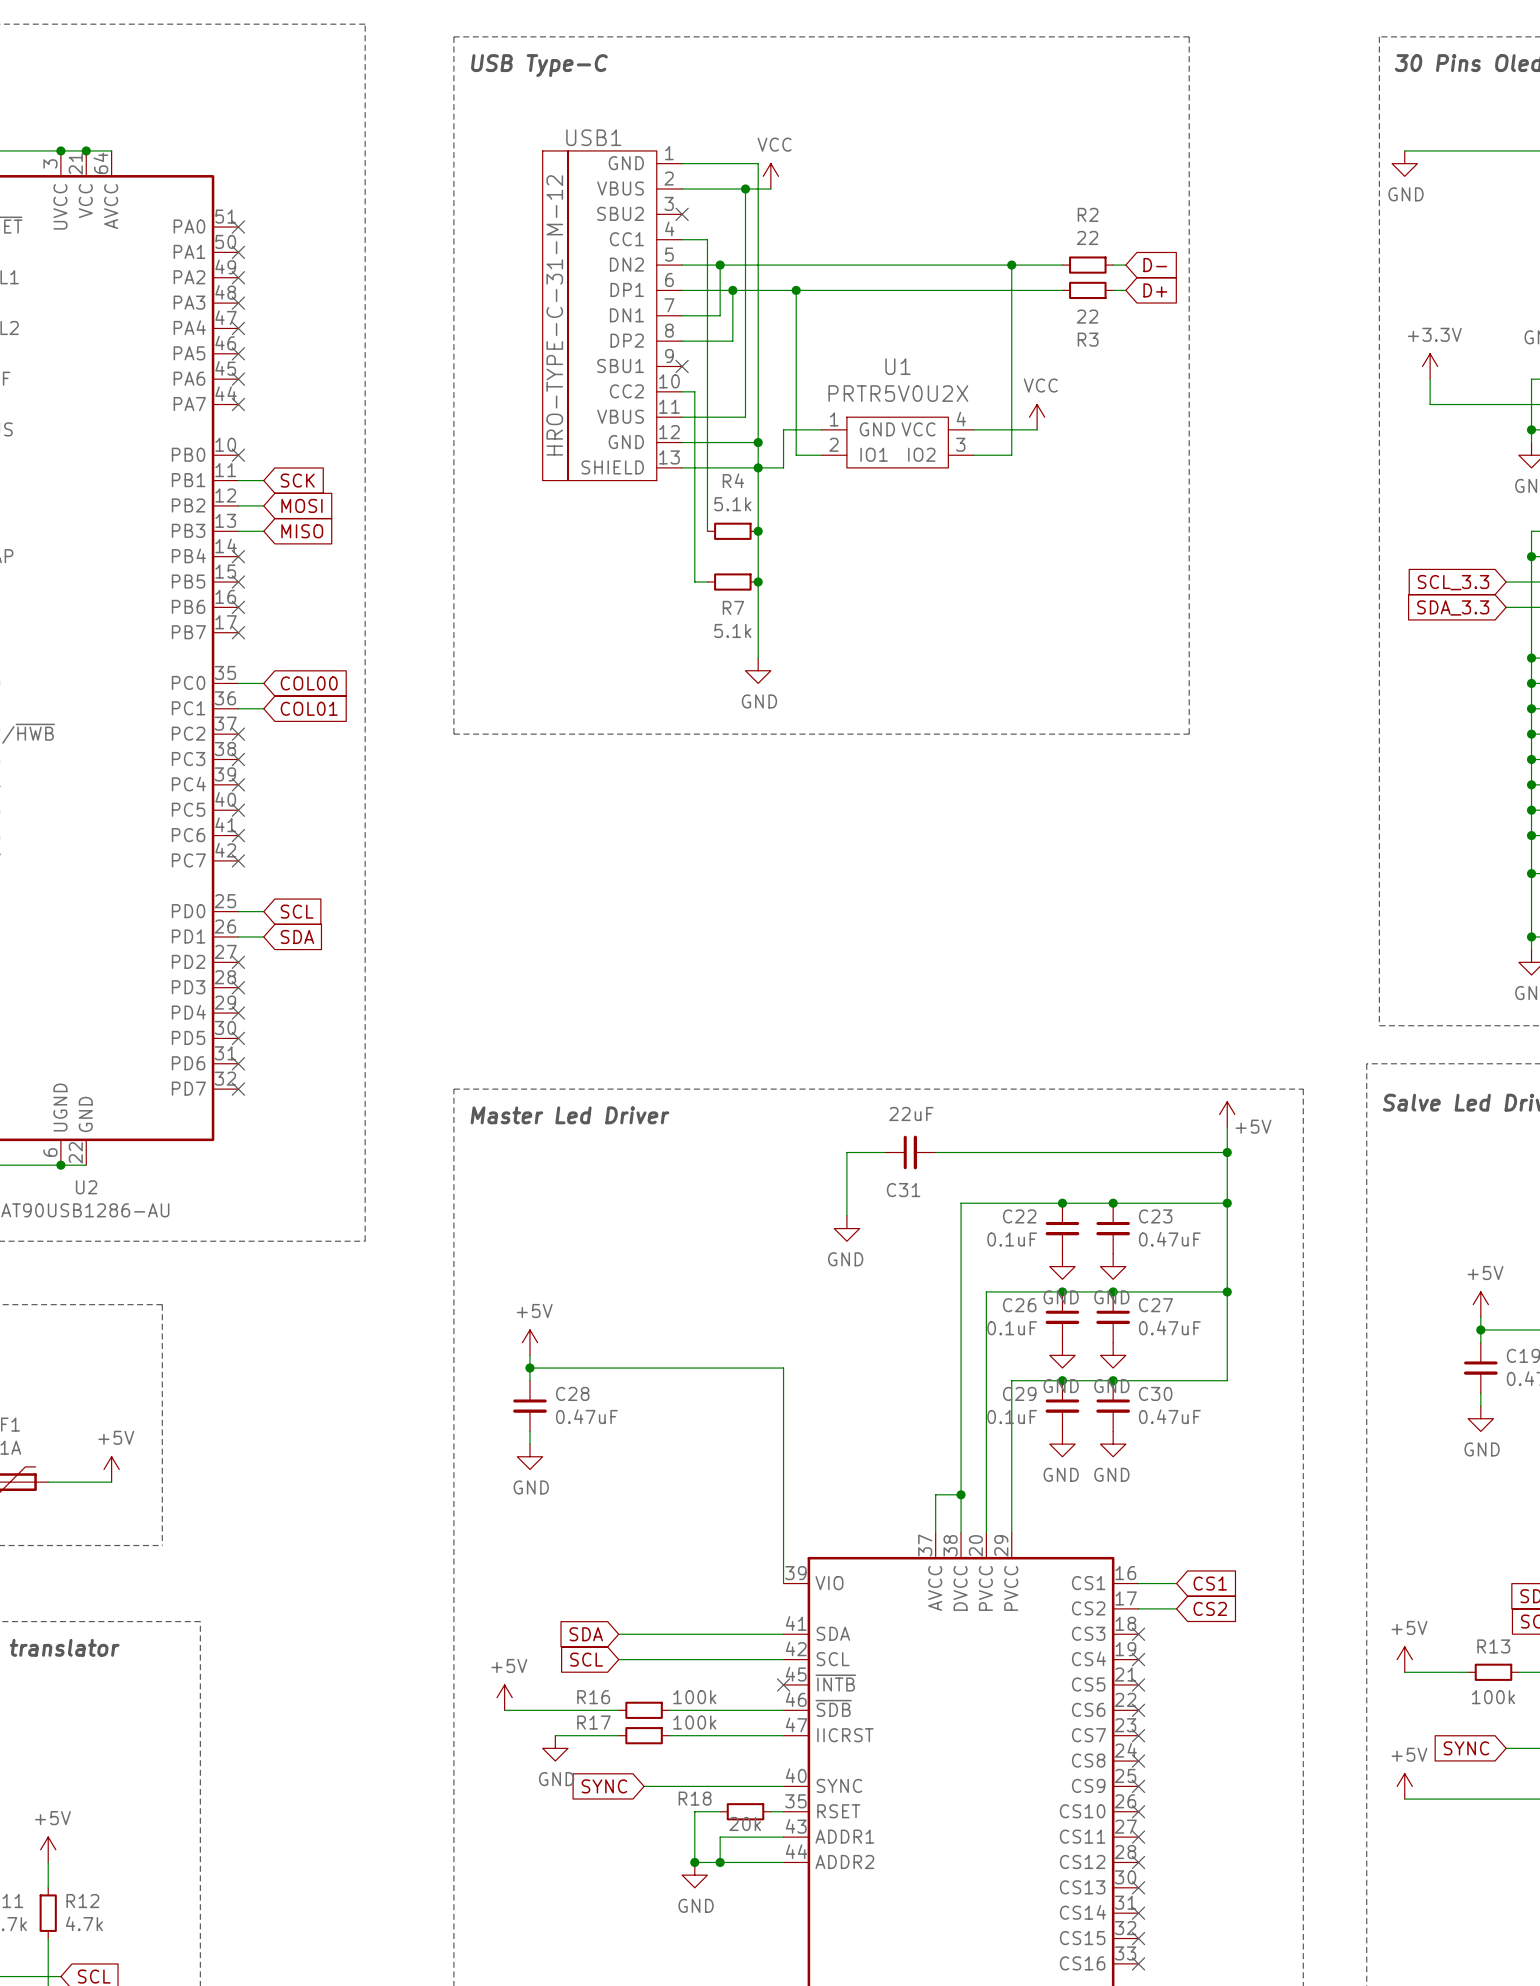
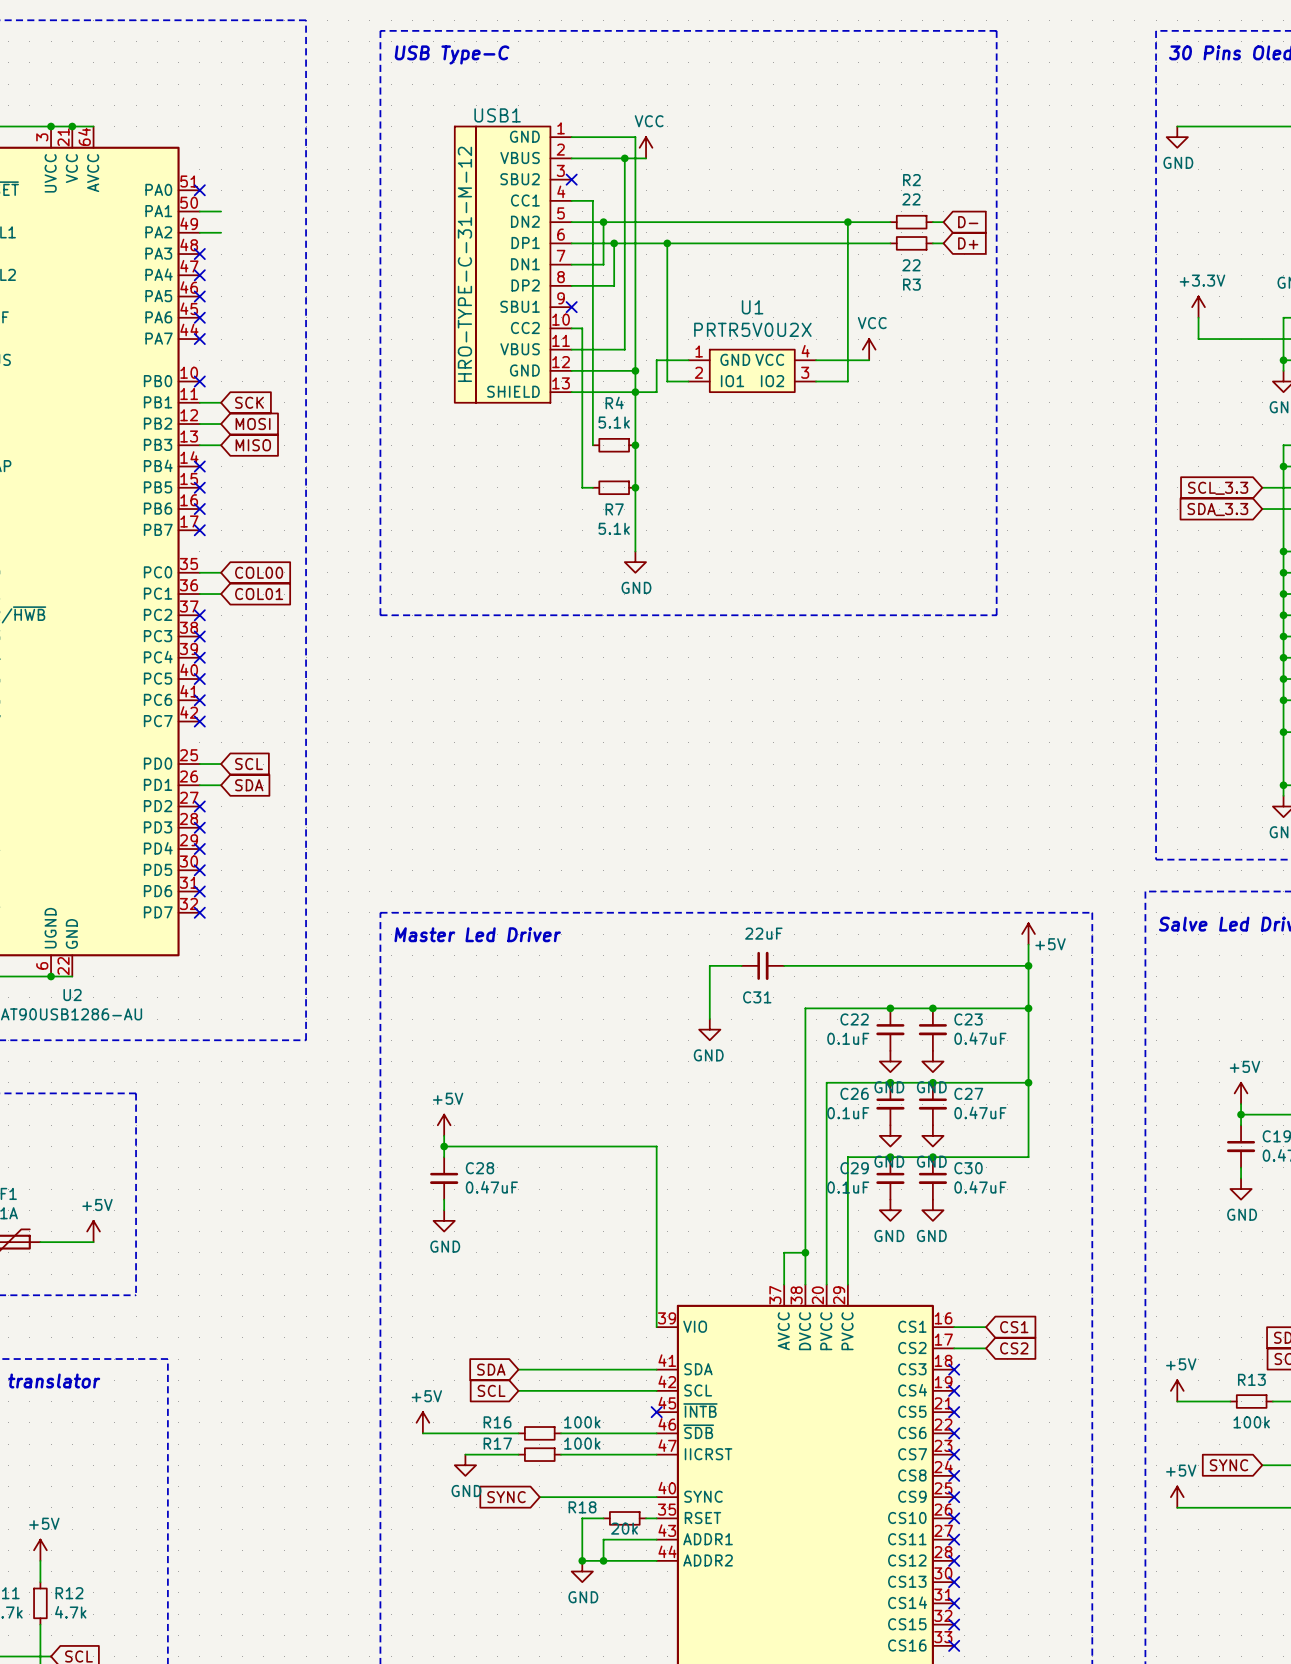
wire: none -> (199, 211) (221, 211)
no-connect mark: (238, 252) -> none
wire: none -> (199, 232) (221, 232)
no-connect mark: (238, 277) -> none

